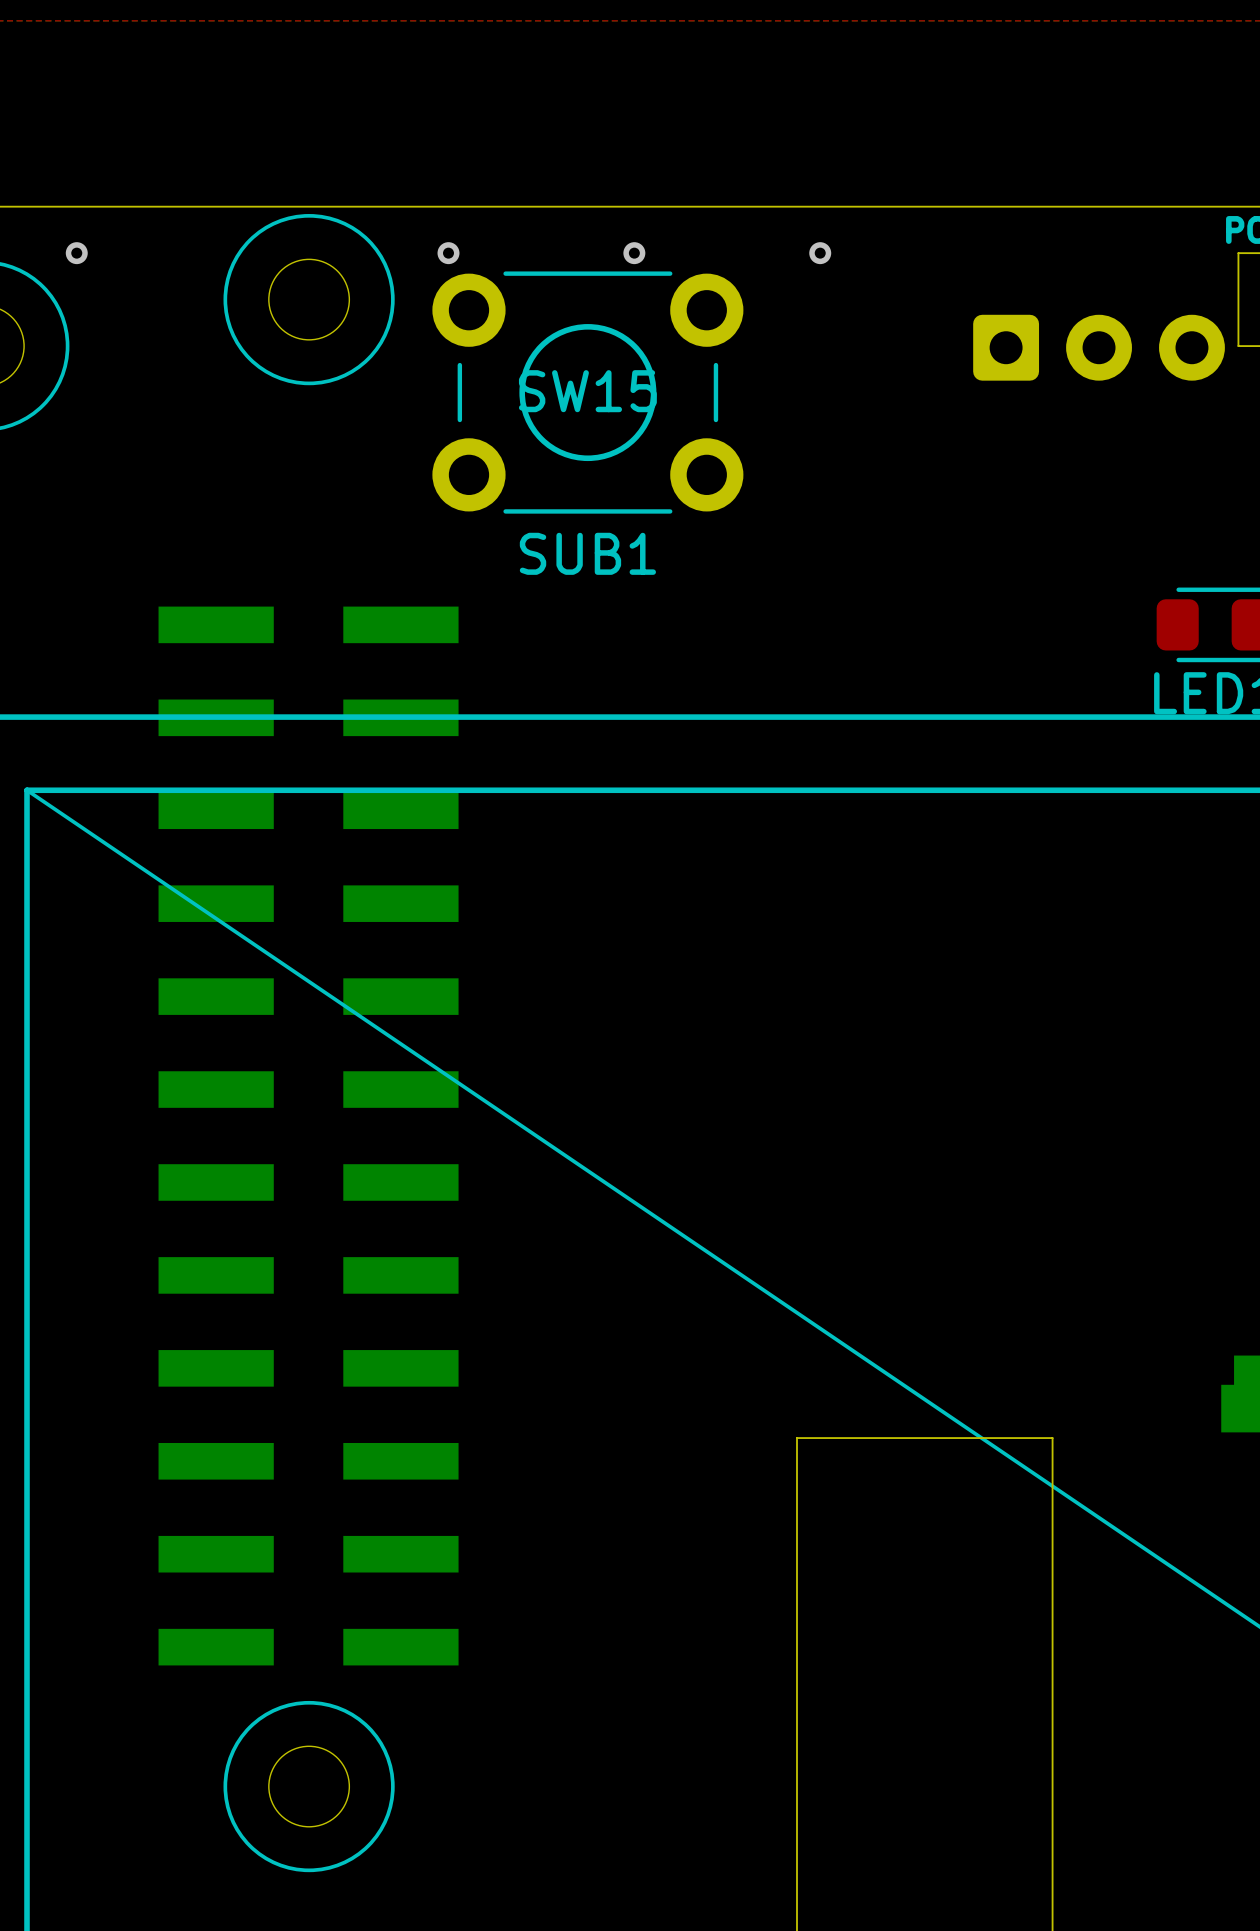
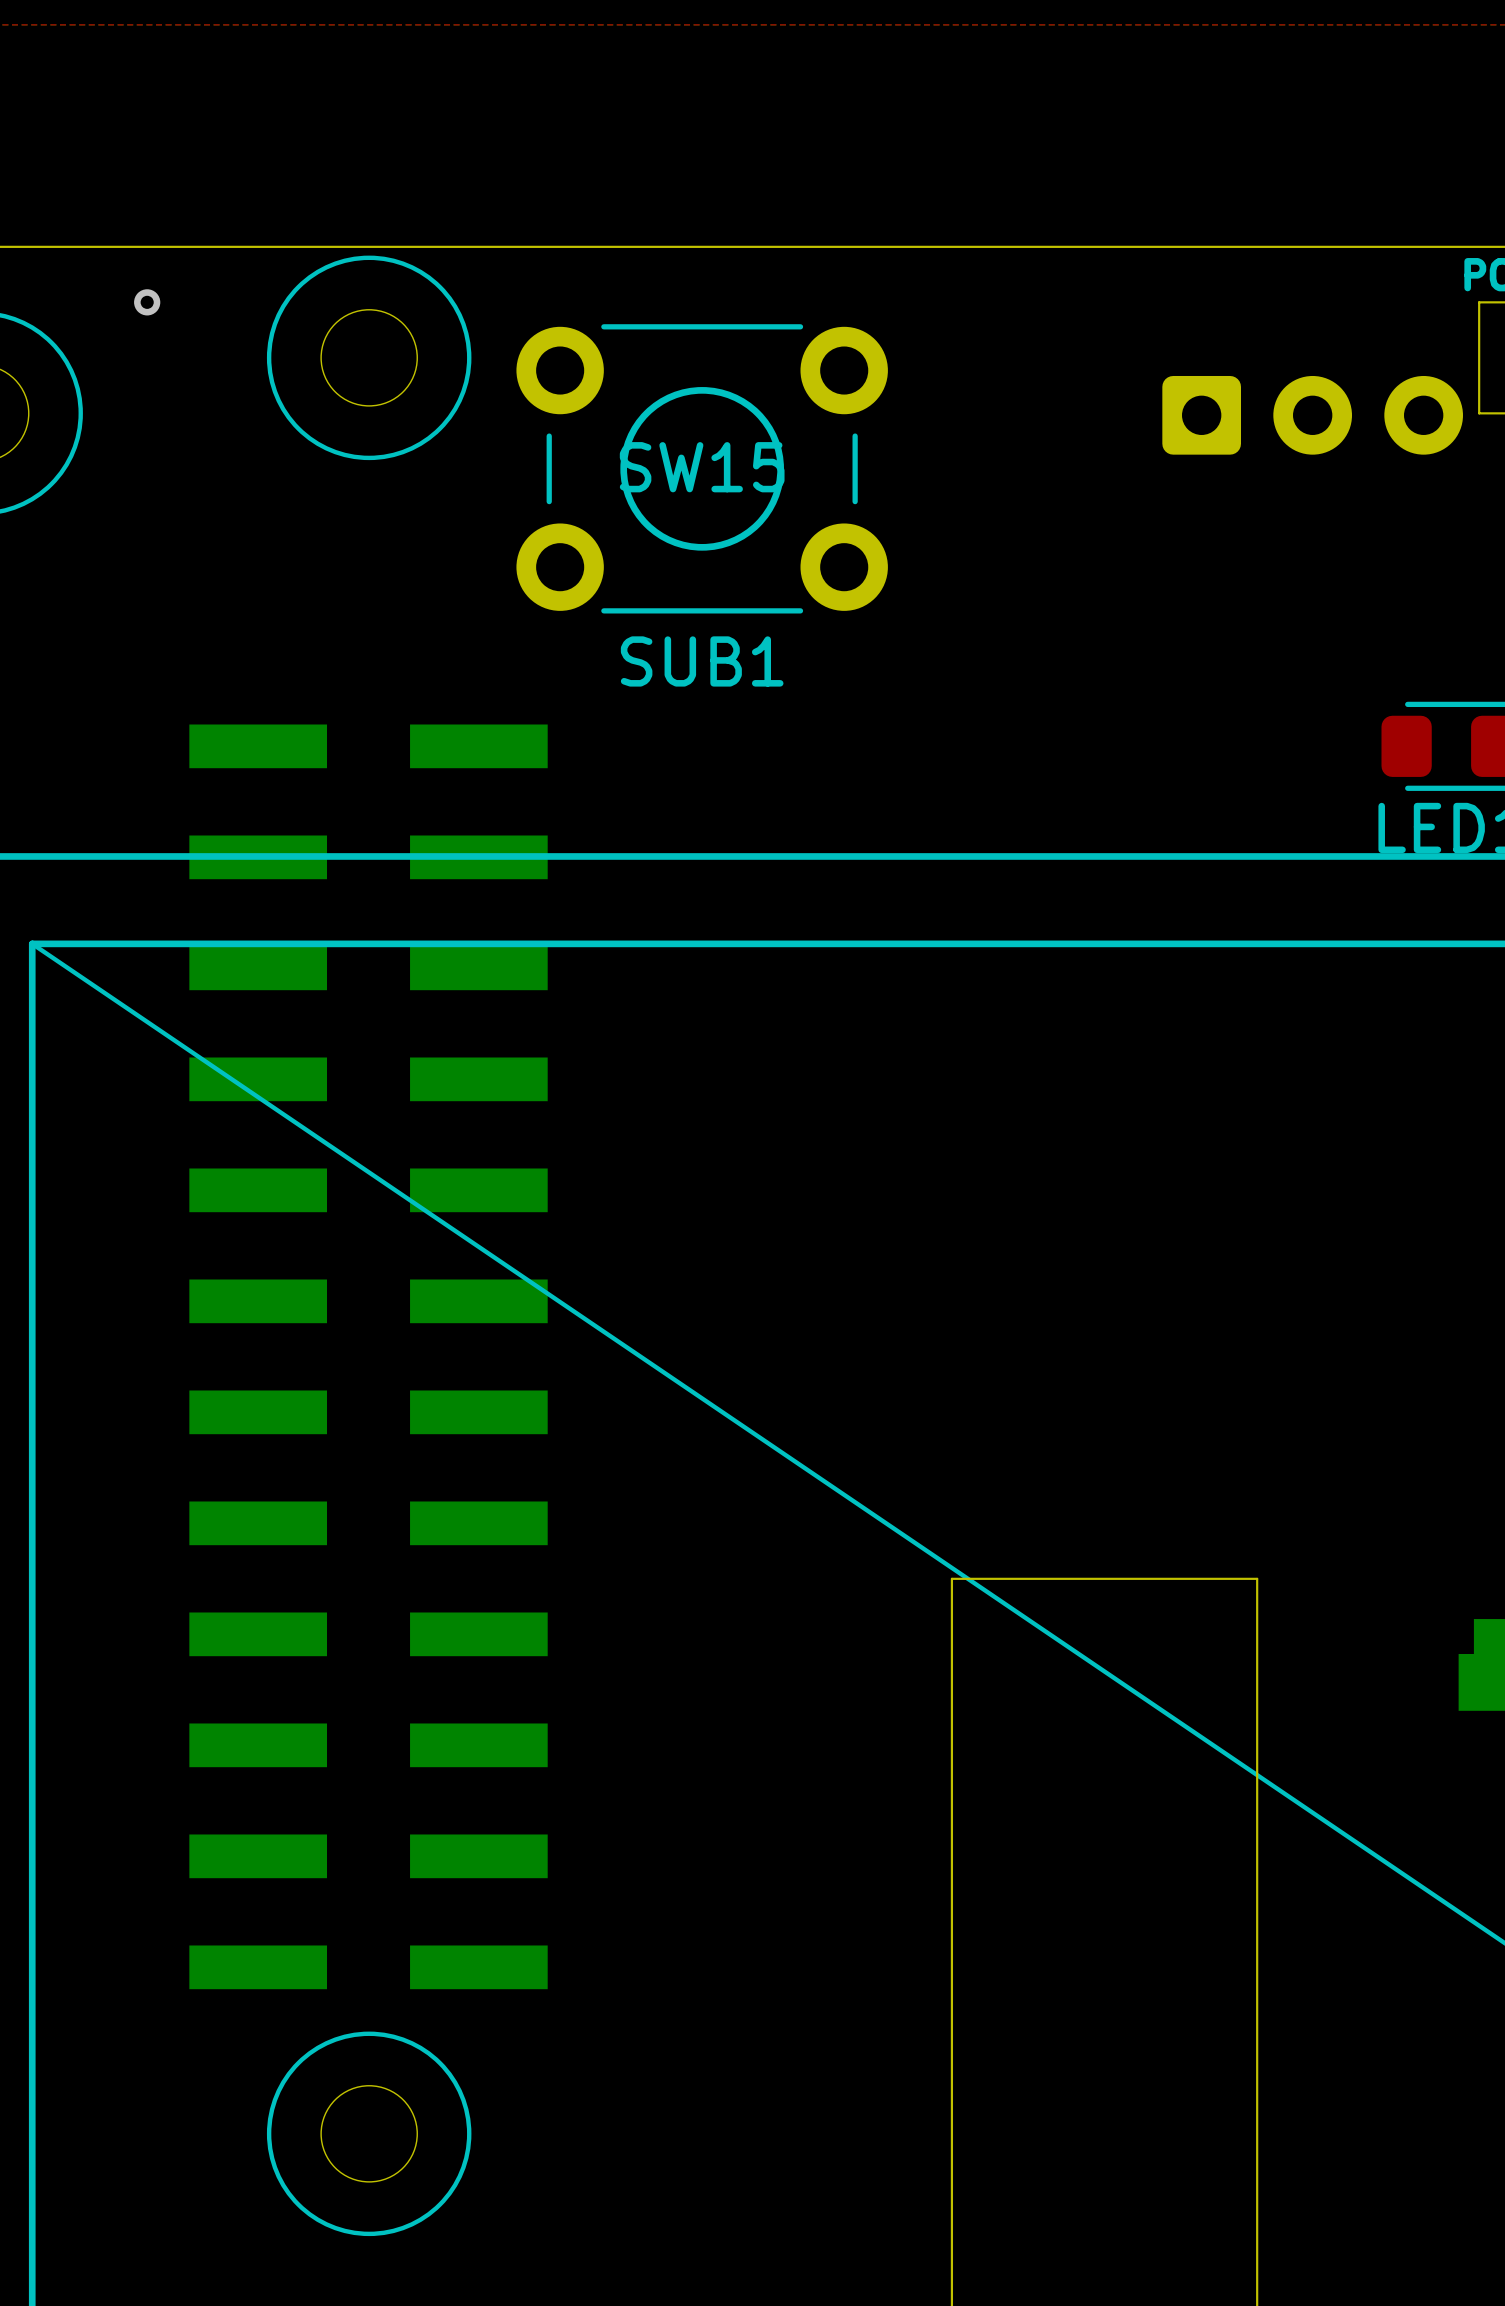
via: (76, 253) -> none
via: none -> (147, 302)
via: (448, 253) -> none
via: (634, 253) -> none
via: (820, 253) -> none
board edge: (796, 1438) (1052, 1438) -> (951, 1717) (951, 1578) (1257, 1578) (1257, 1717)

